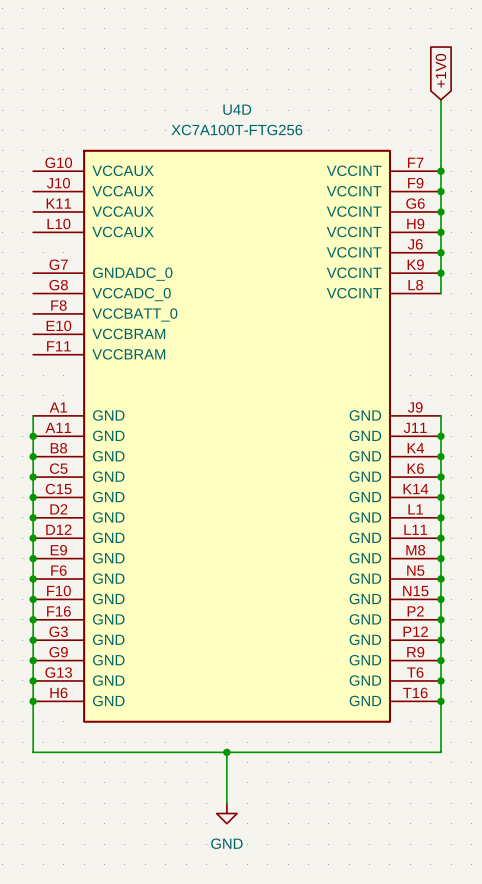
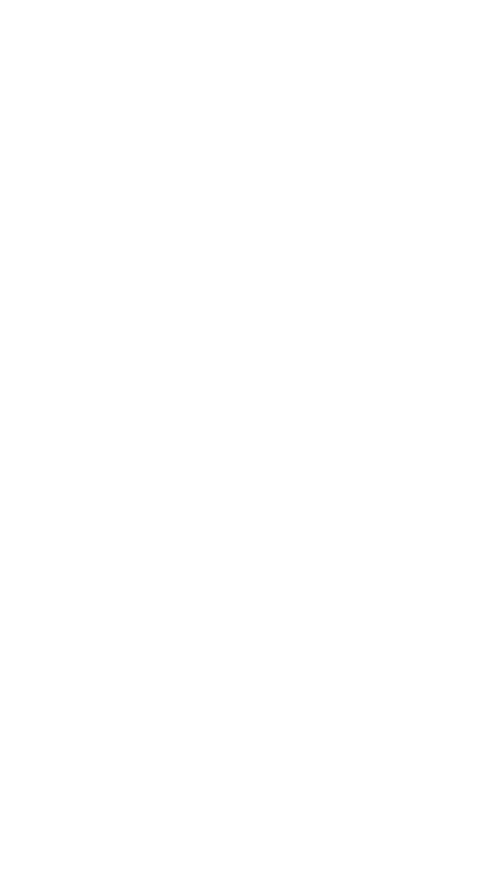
global label: +1V0 (440, 70) -> none
wire: (440, 99) (440, 293) -> none
junction: (440, 171) -> none
junction: (440, 191) -> none
junction: (440, 211) -> none
junction: (440, 232) -> none
junction: (440, 252) -> none
junction: (440, 273) -> none
wire: (33, 415) (33, 752) (440, 752) (440, 415) -> none
junction: (33, 436) -> none
U4D: XC7A100T-FTG256 (237, 436) -> none
junction: (440, 436) -> none
junction: (33, 456) -> none
junction: (440, 456) -> none
junction: (33, 477) -> none
junction: (440, 477) -> none
junction: (33, 497) -> none
junction: (440, 497) -> none
junction: (33, 517) -> none
junction: (440, 517) -> none
junction: (33, 538) -> none
junction: (440, 538) -> none
junction: (33, 558) -> none
junction: (440, 558) -> none
junction: (33, 579) -> none
junction: (440, 579) -> none
junction: (33, 599) -> none
junction: (440, 599) -> none
junction: (33, 619) -> none
junction: (440, 619) -> none
junction: (33, 640) -> none
junction: (440, 640) -> none
junction: (33, 660) -> none
junction: (440, 660) -> none
junction: (33, 680) -> none
junction: (440, 680) -> none
junction: (33, 701) -> none
junction: (440, 701) -> none
wire: (226, 752) (226, 803) -> none
junction: (226, 752) -> none
power symbol: GND (226, 813) -> none

